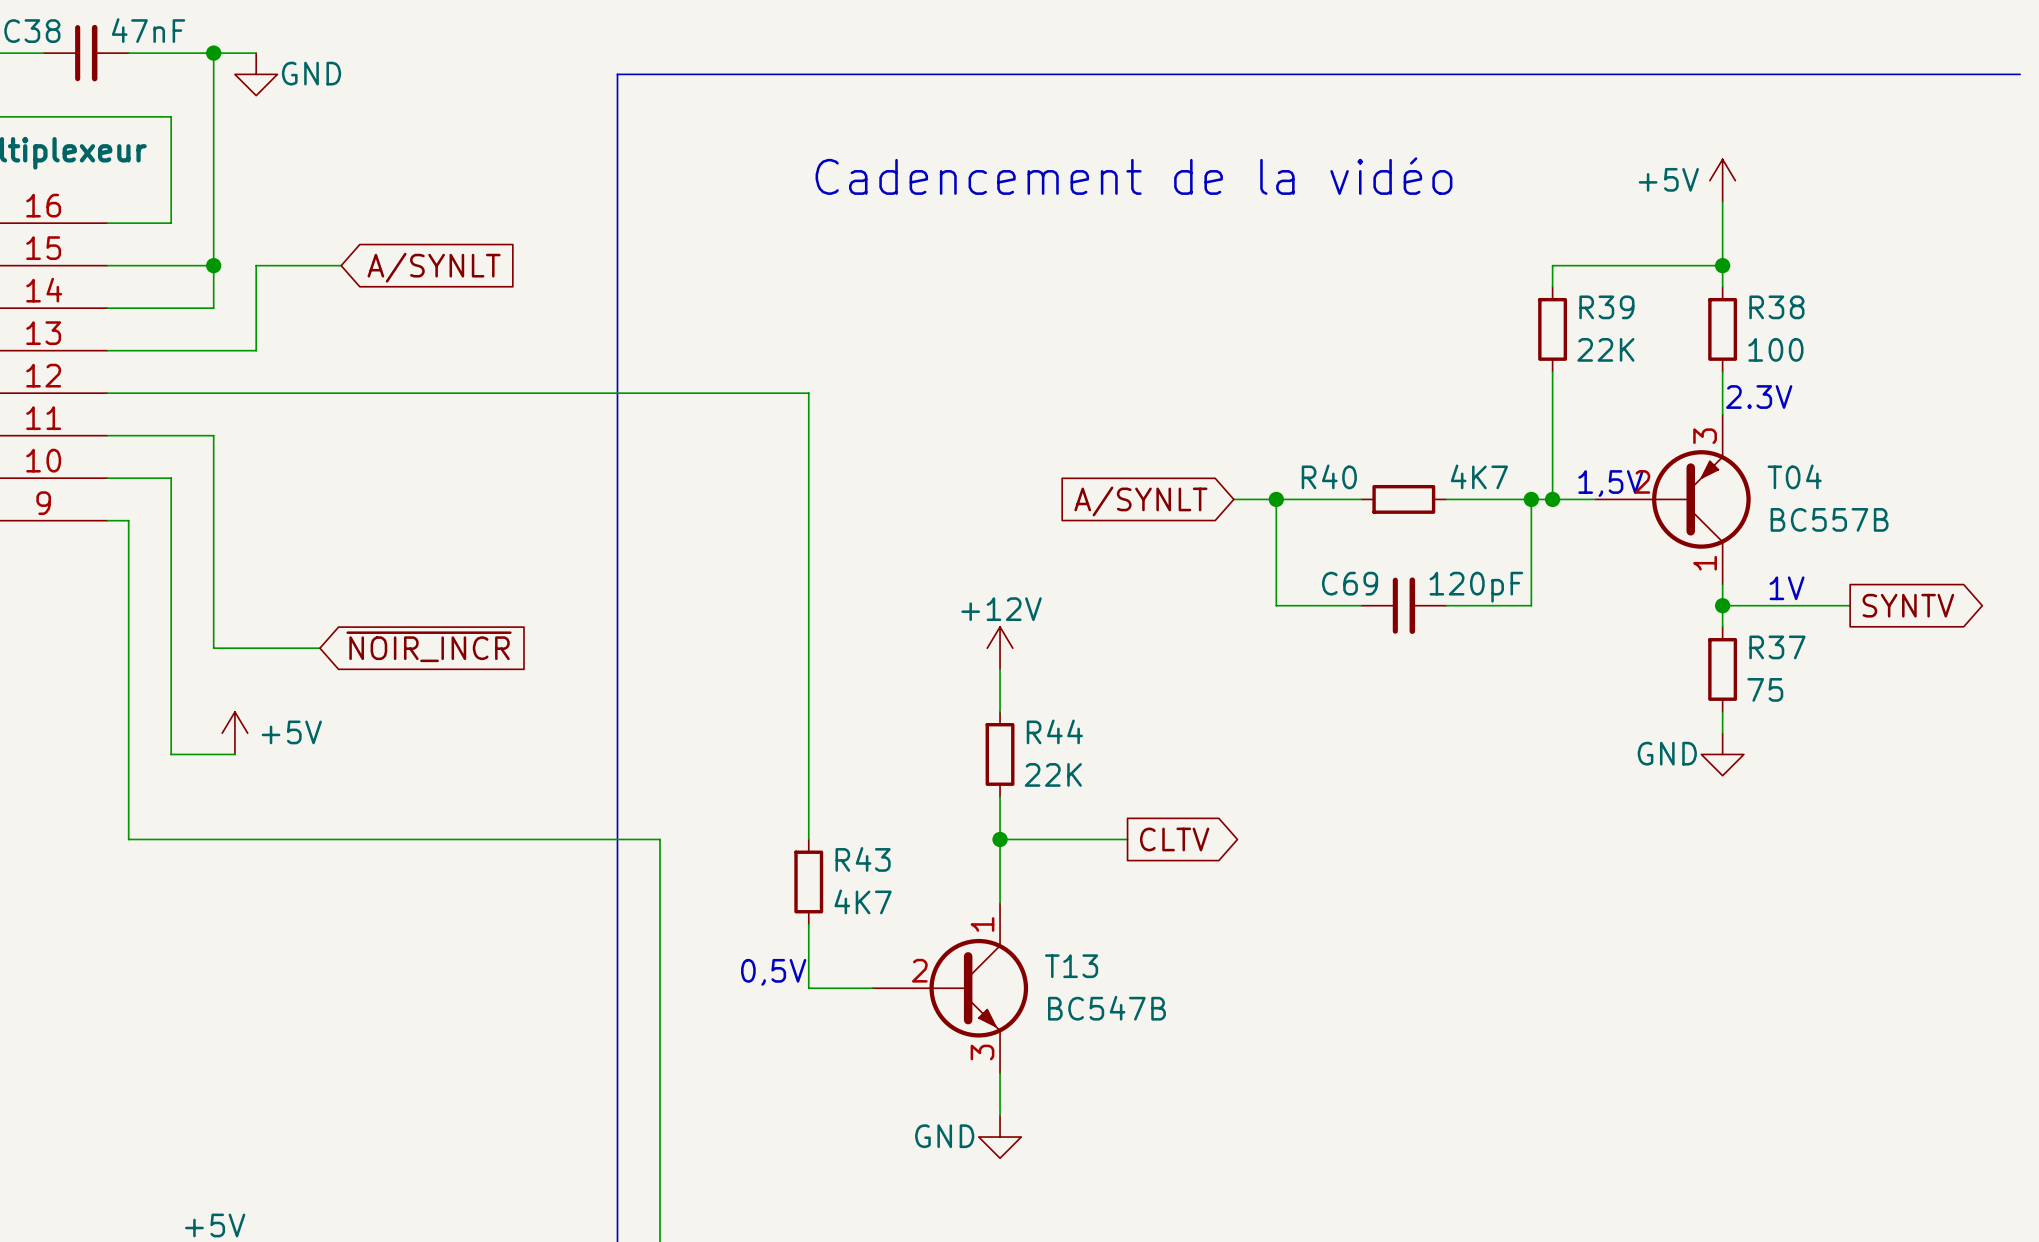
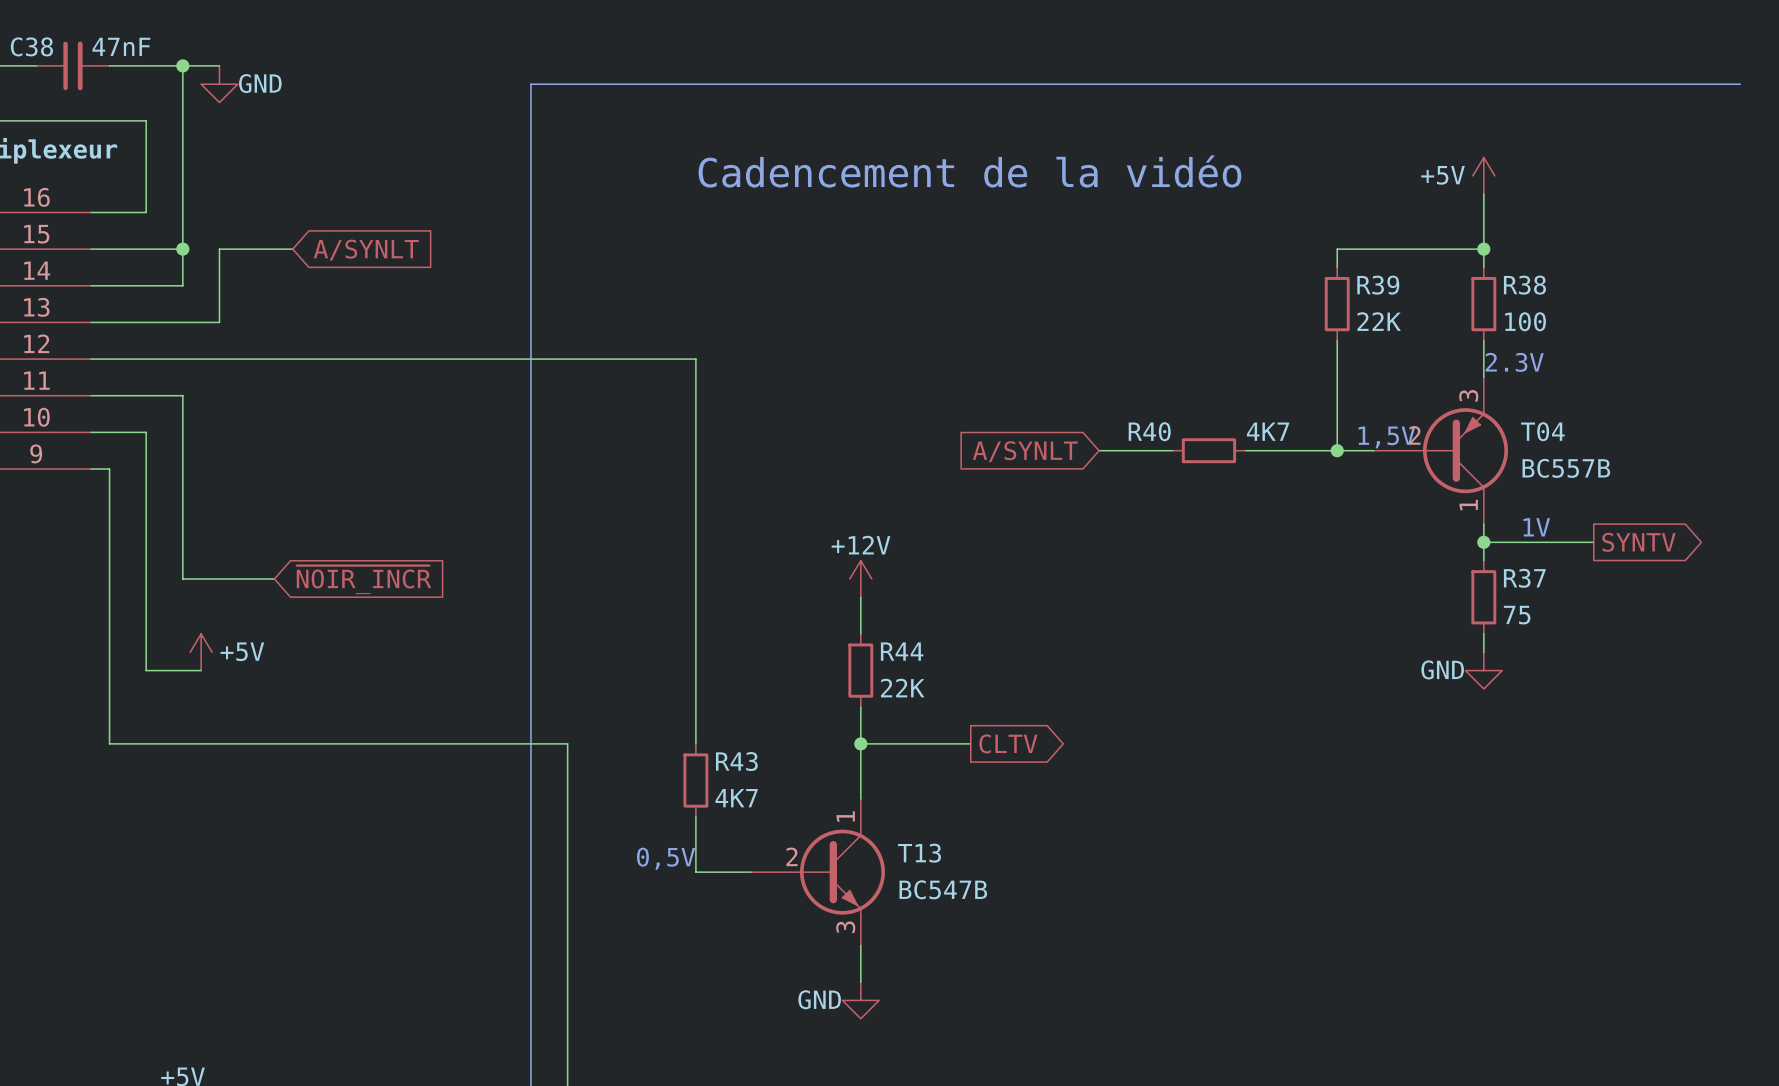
wire: (1233, 499) (1276, 499) (1276, 605) (1361, 605) -> none
junction: (1276, 499) -> none
wire: (1531, 499) (1531, 605) (1446, 605) -> none
junction: (1531, 499) -> none
global label position: A/SYNLT (1140, 501) -> A/SYNLT (1025, 451)
C69: 120pF (1403, 605) -> none

